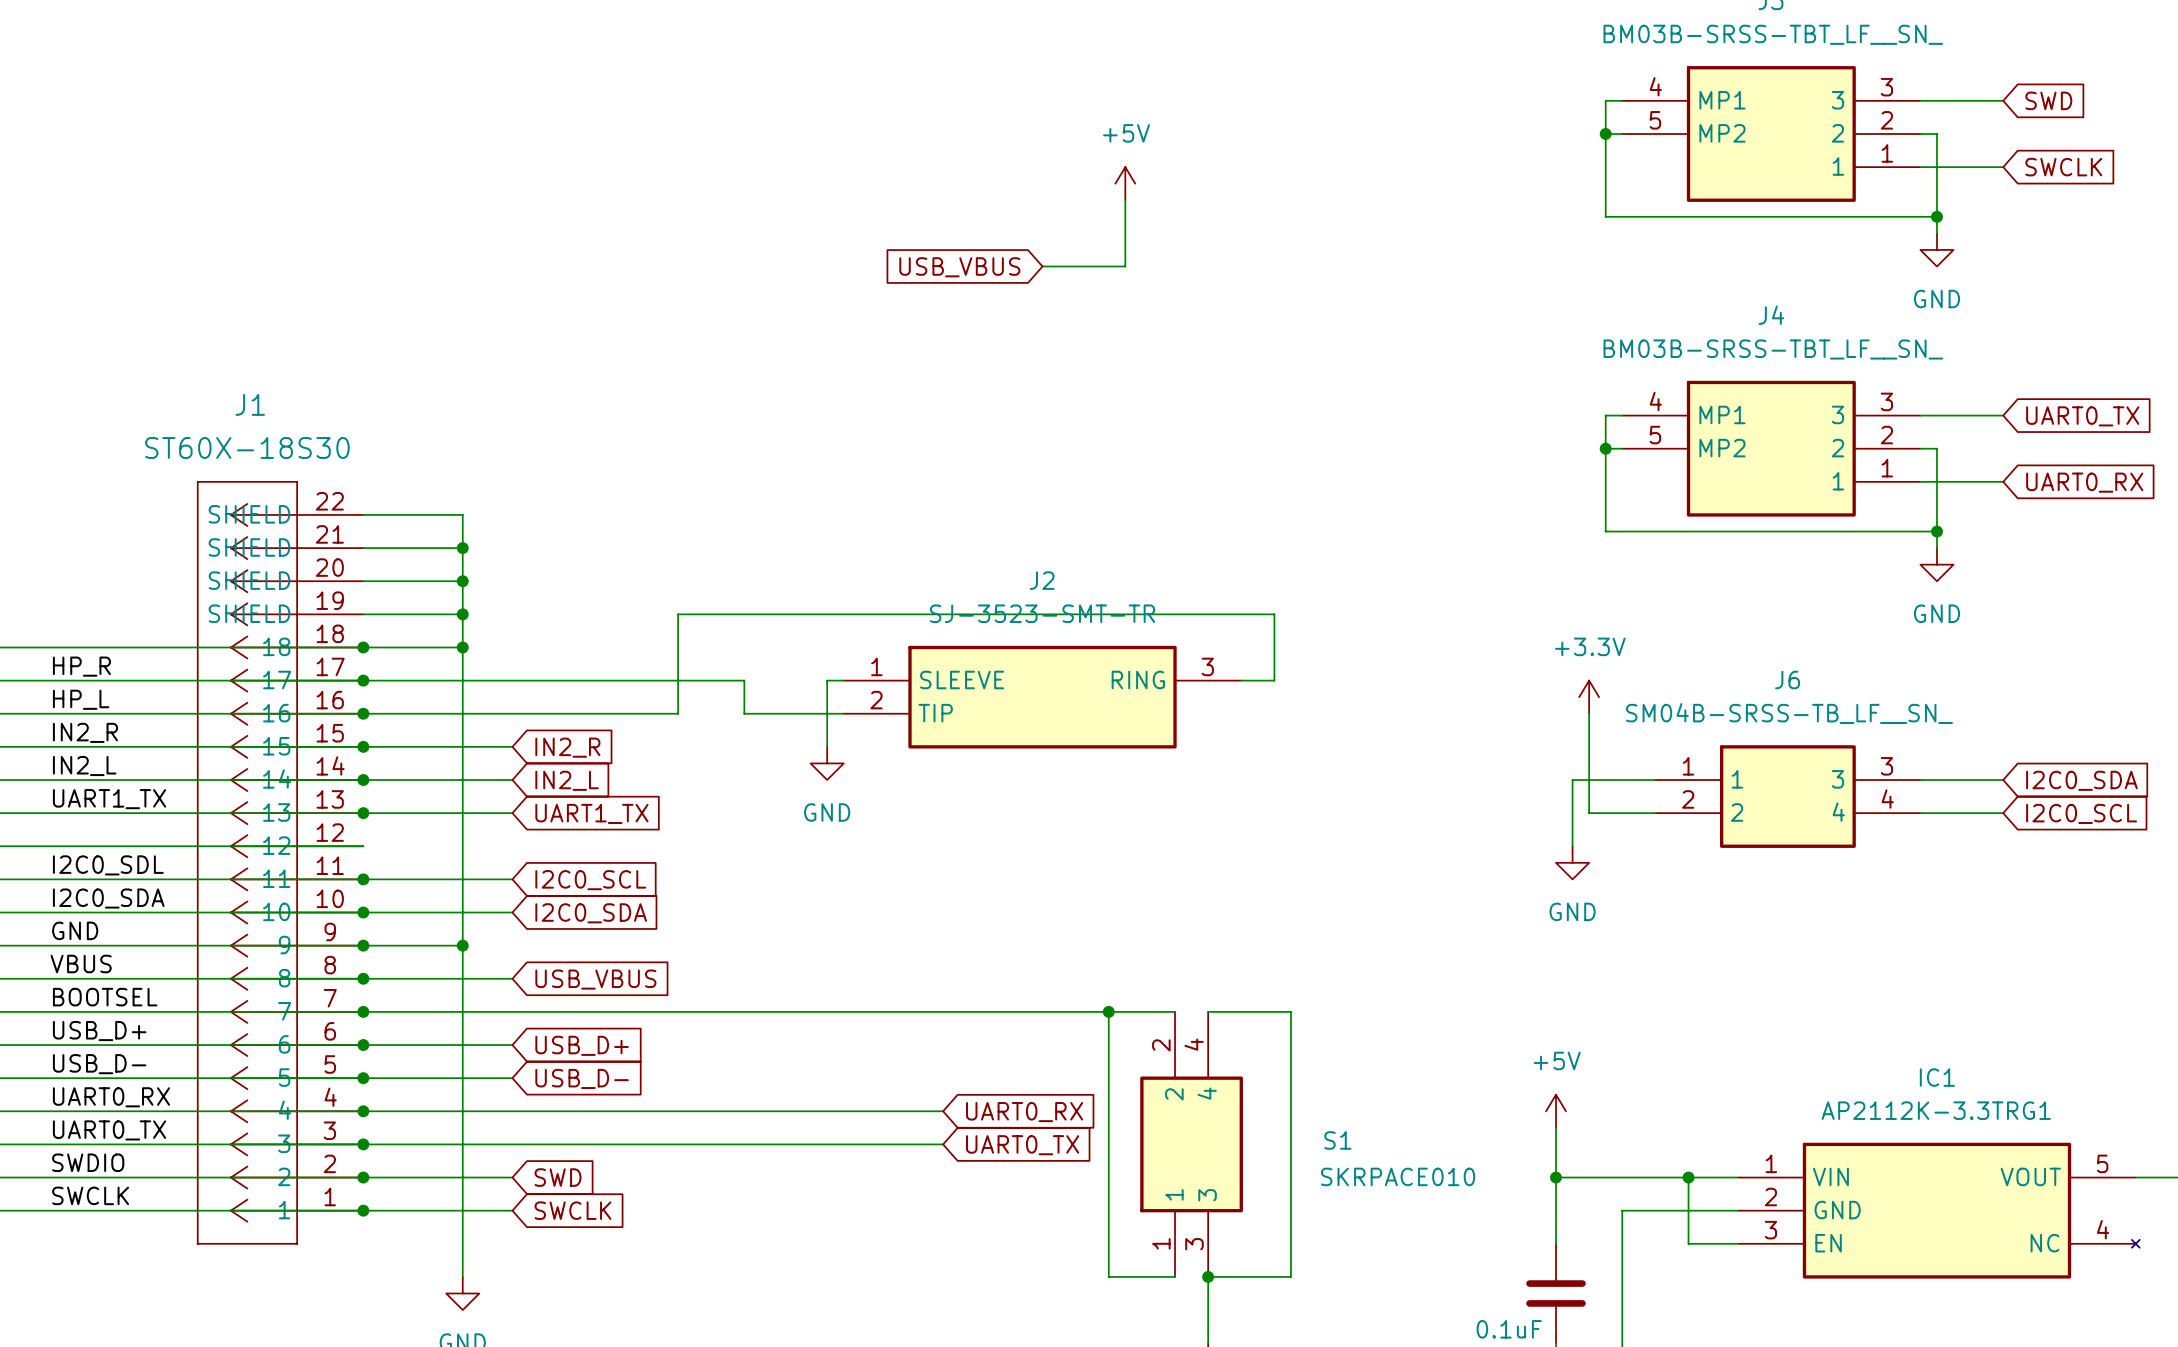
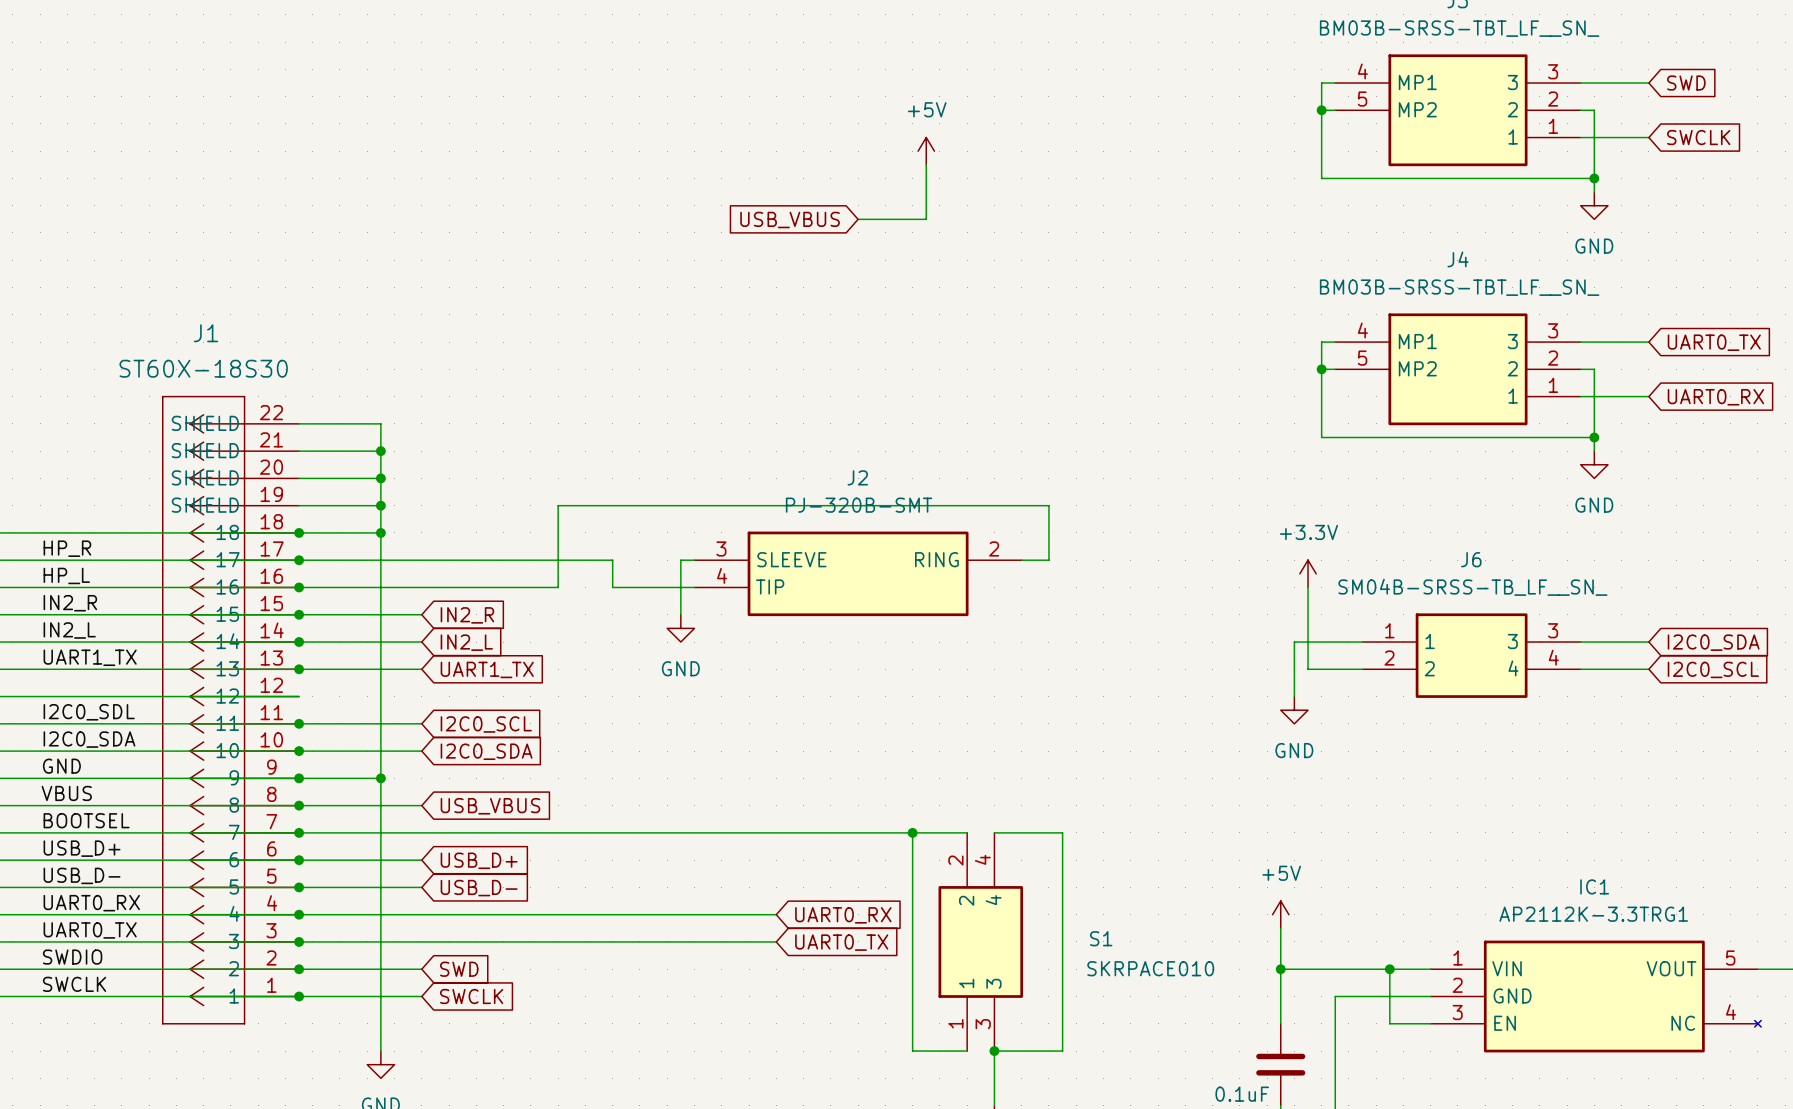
J2 value: SJ-3523-SMT-TR (1042, 613) -> PJ-320B-SMT (859, 505)
J2 pin number: 1 (876, 666) -> 3 (721, 548)
J2 pin number: 3 (1207, 666) -> 2 (994, 548)
J2 pin number: 2 (876, 700) -> 4 (722, 575)

